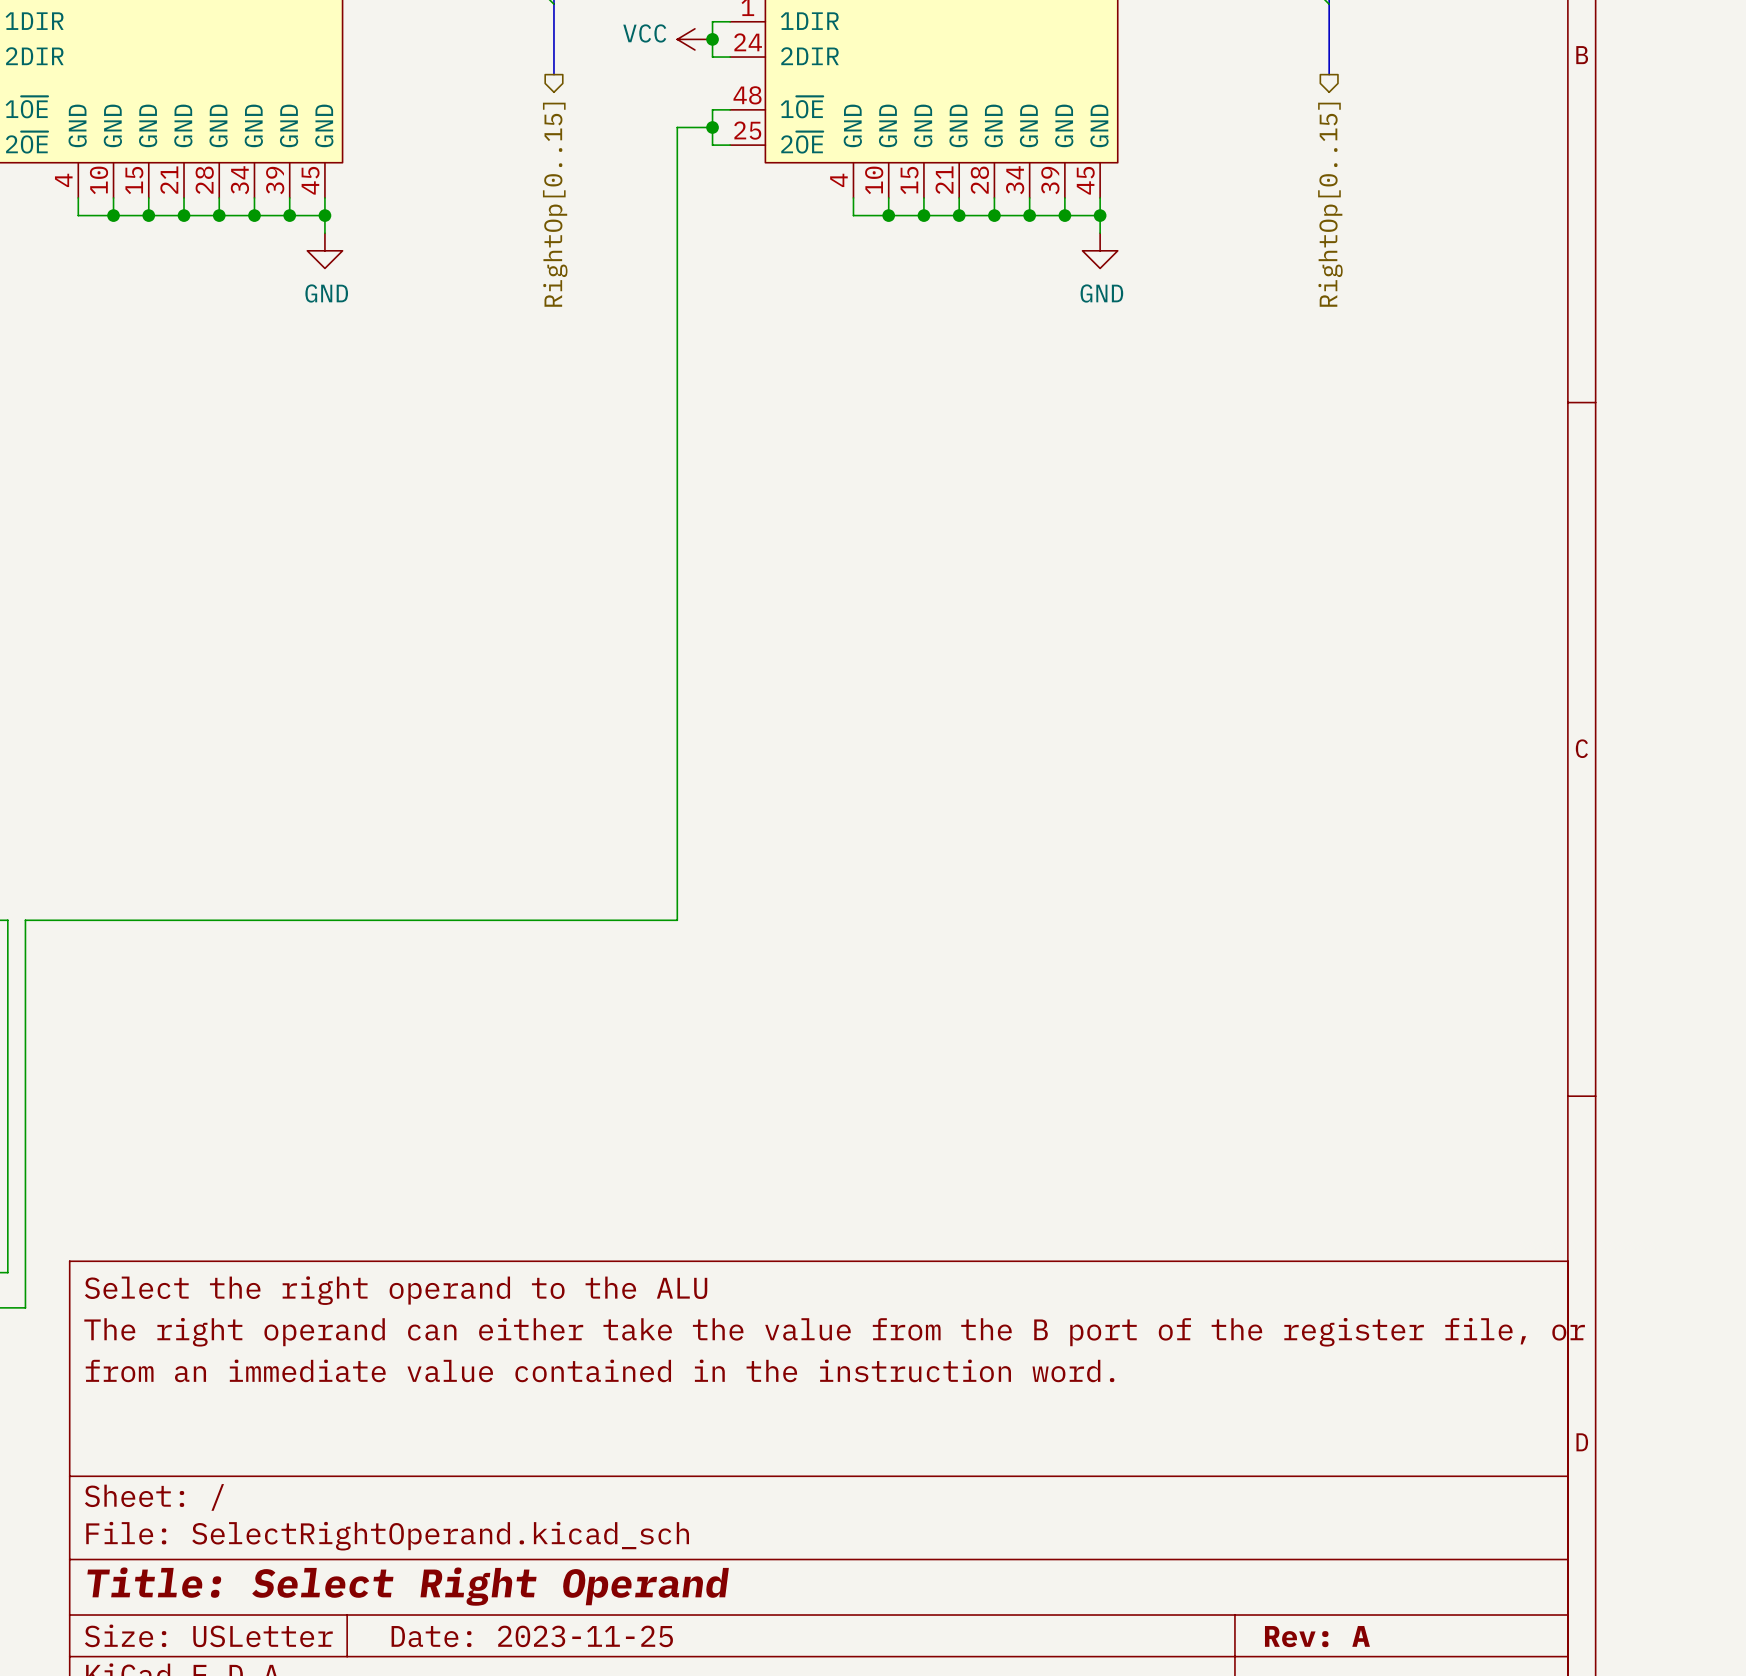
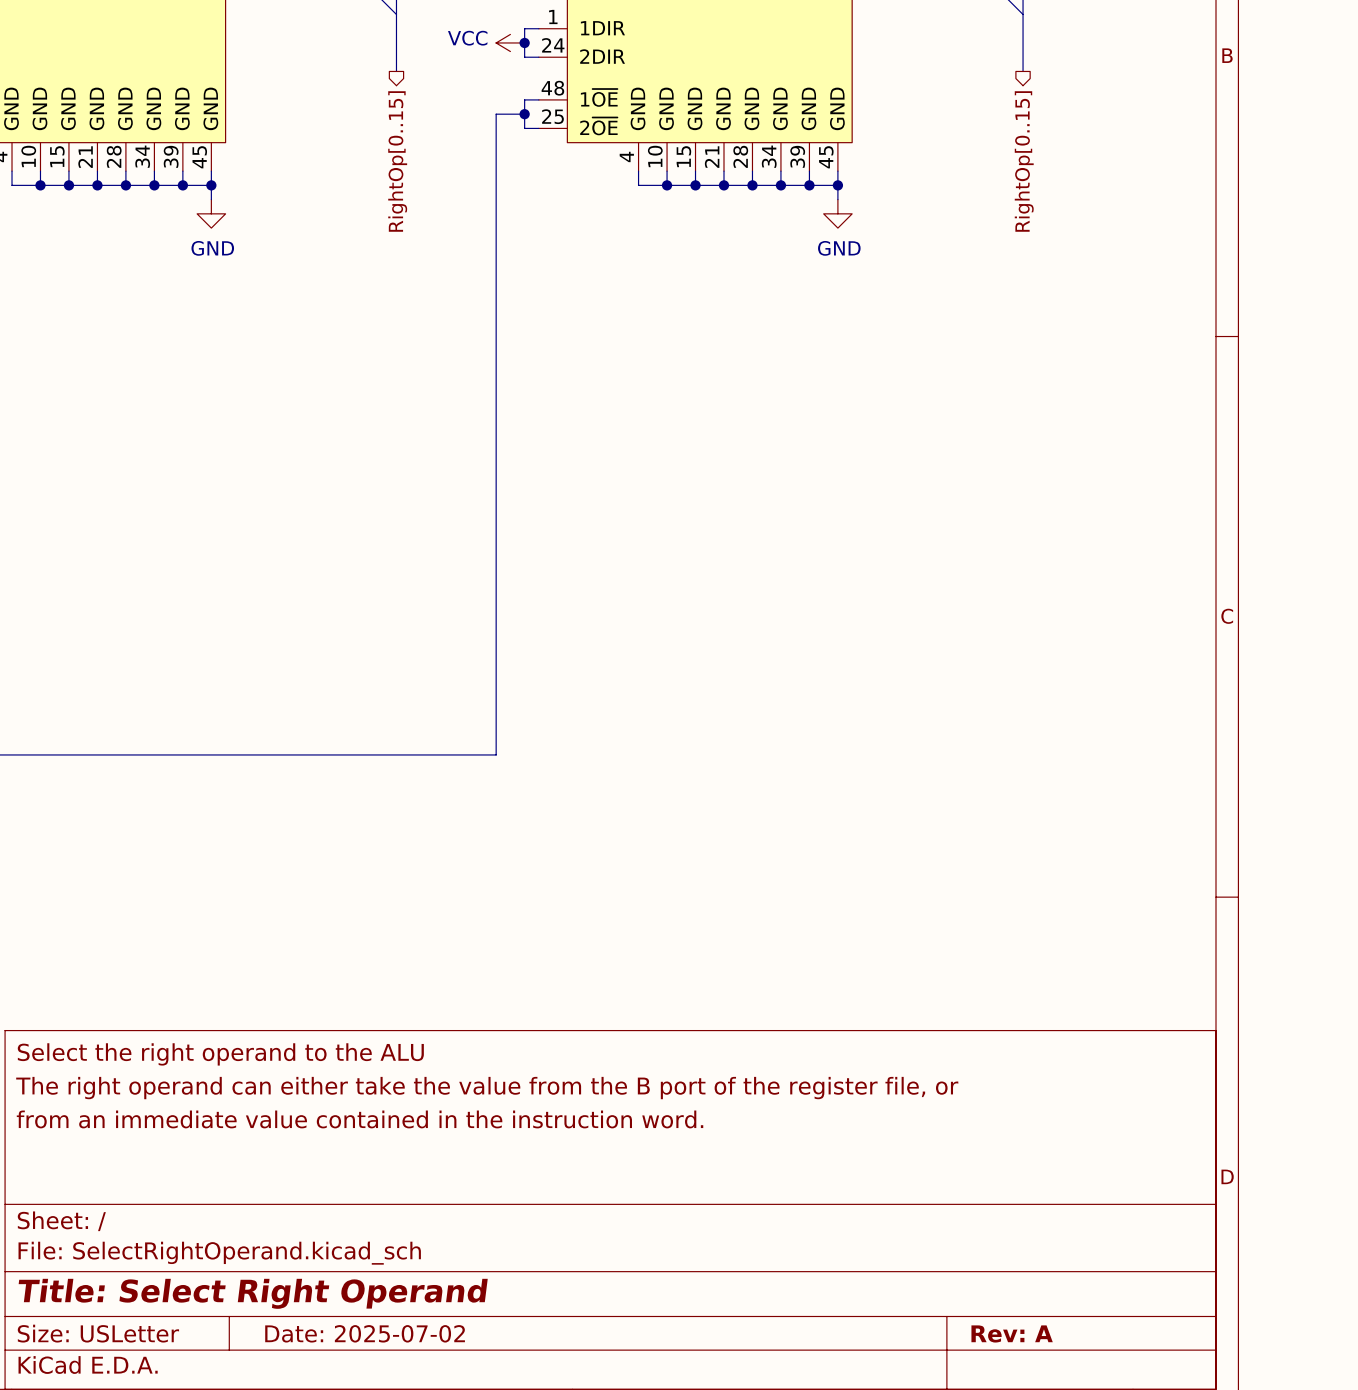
title block: Date: 2023-11-25 (532, 1636) -> Date: 2025-07-02 (365, 1333)

